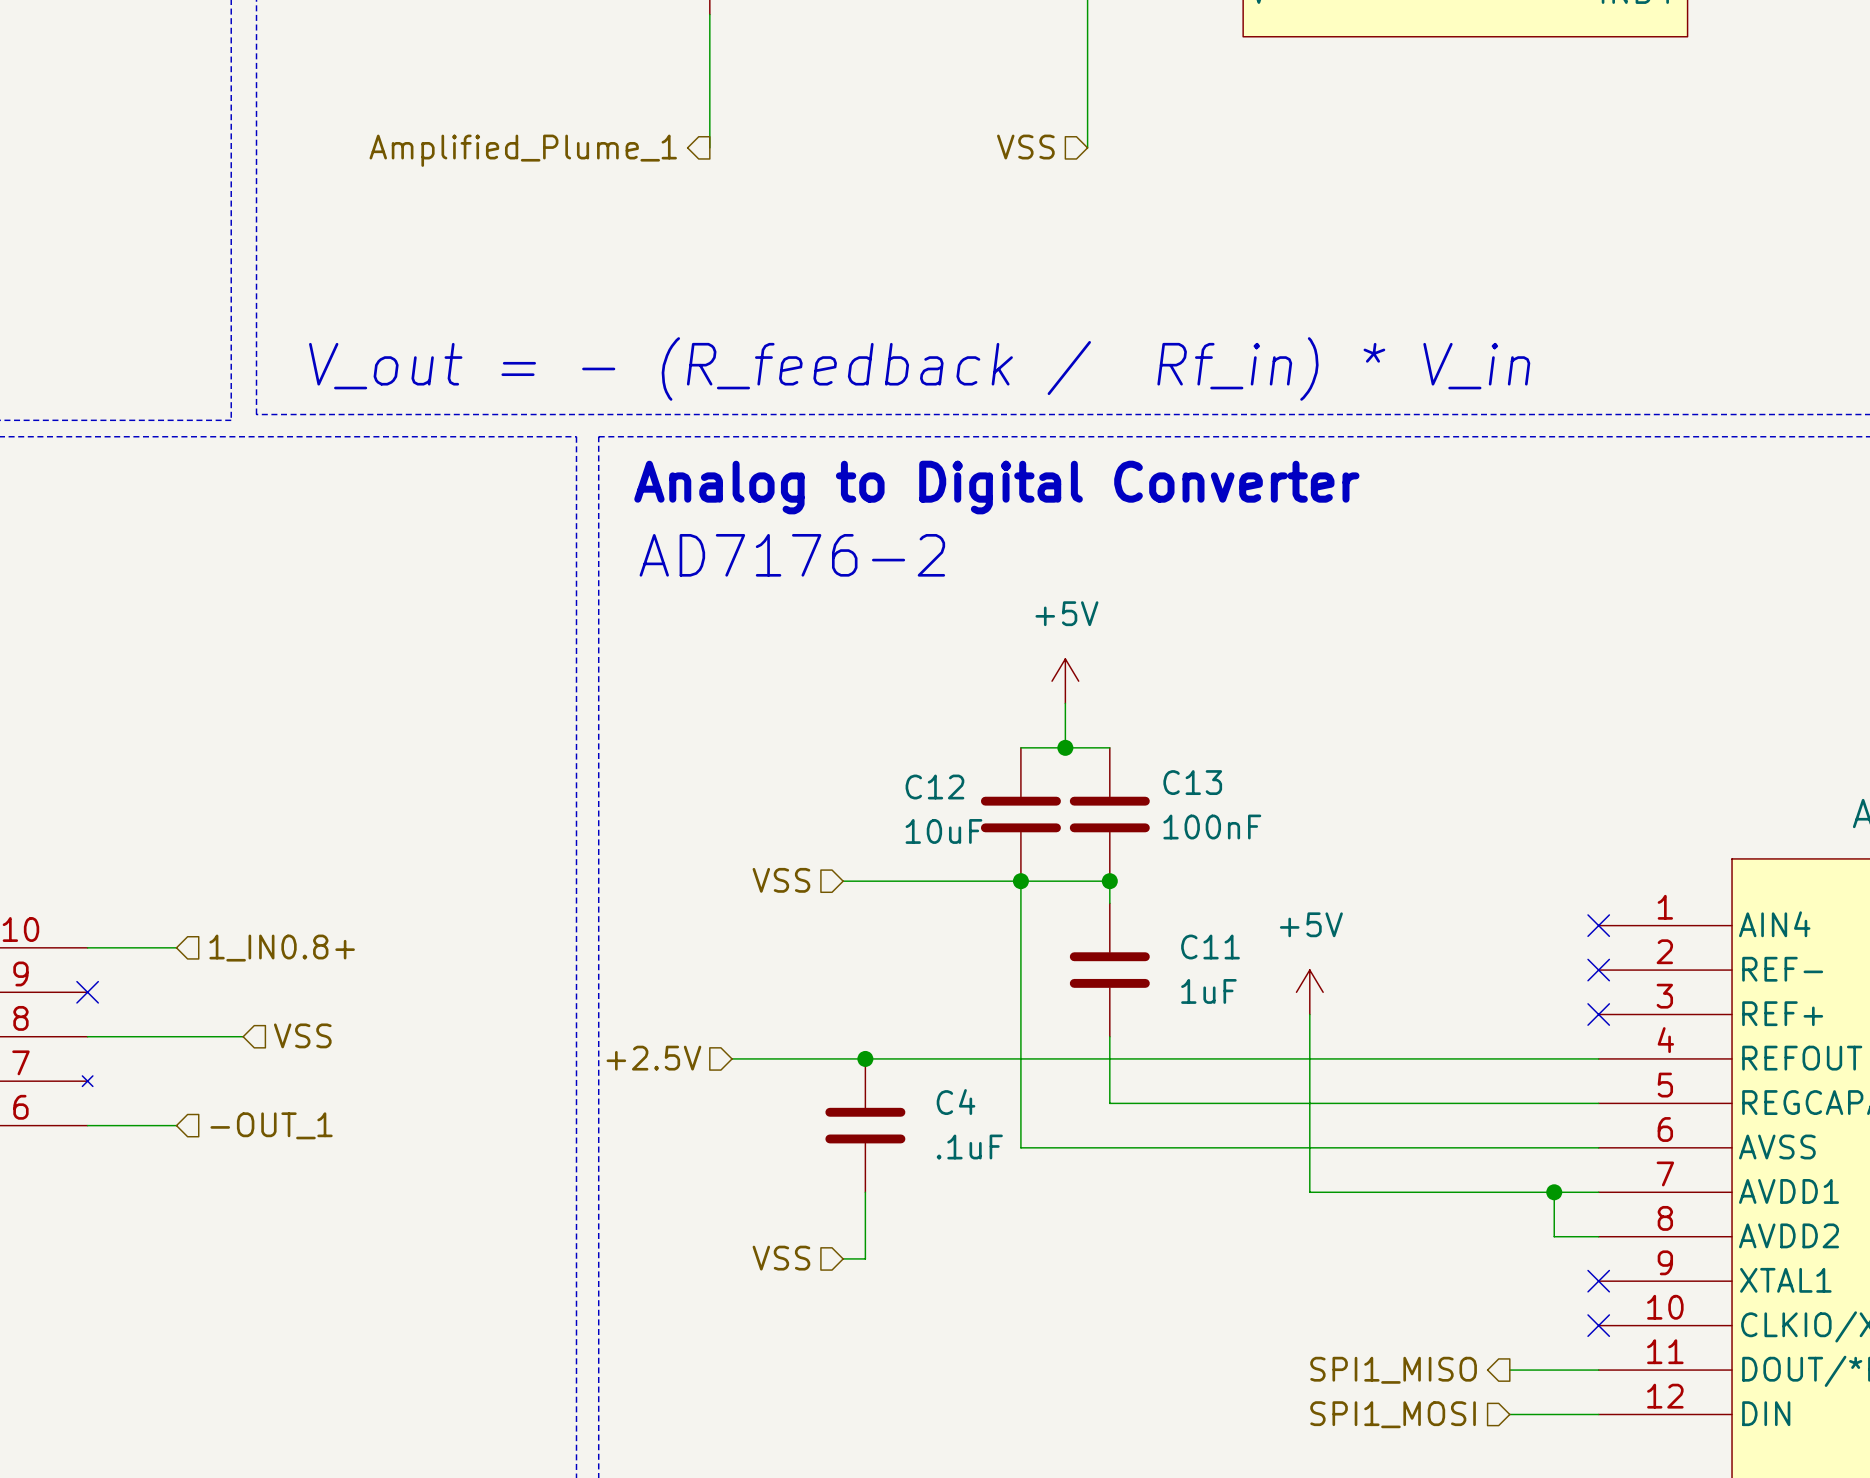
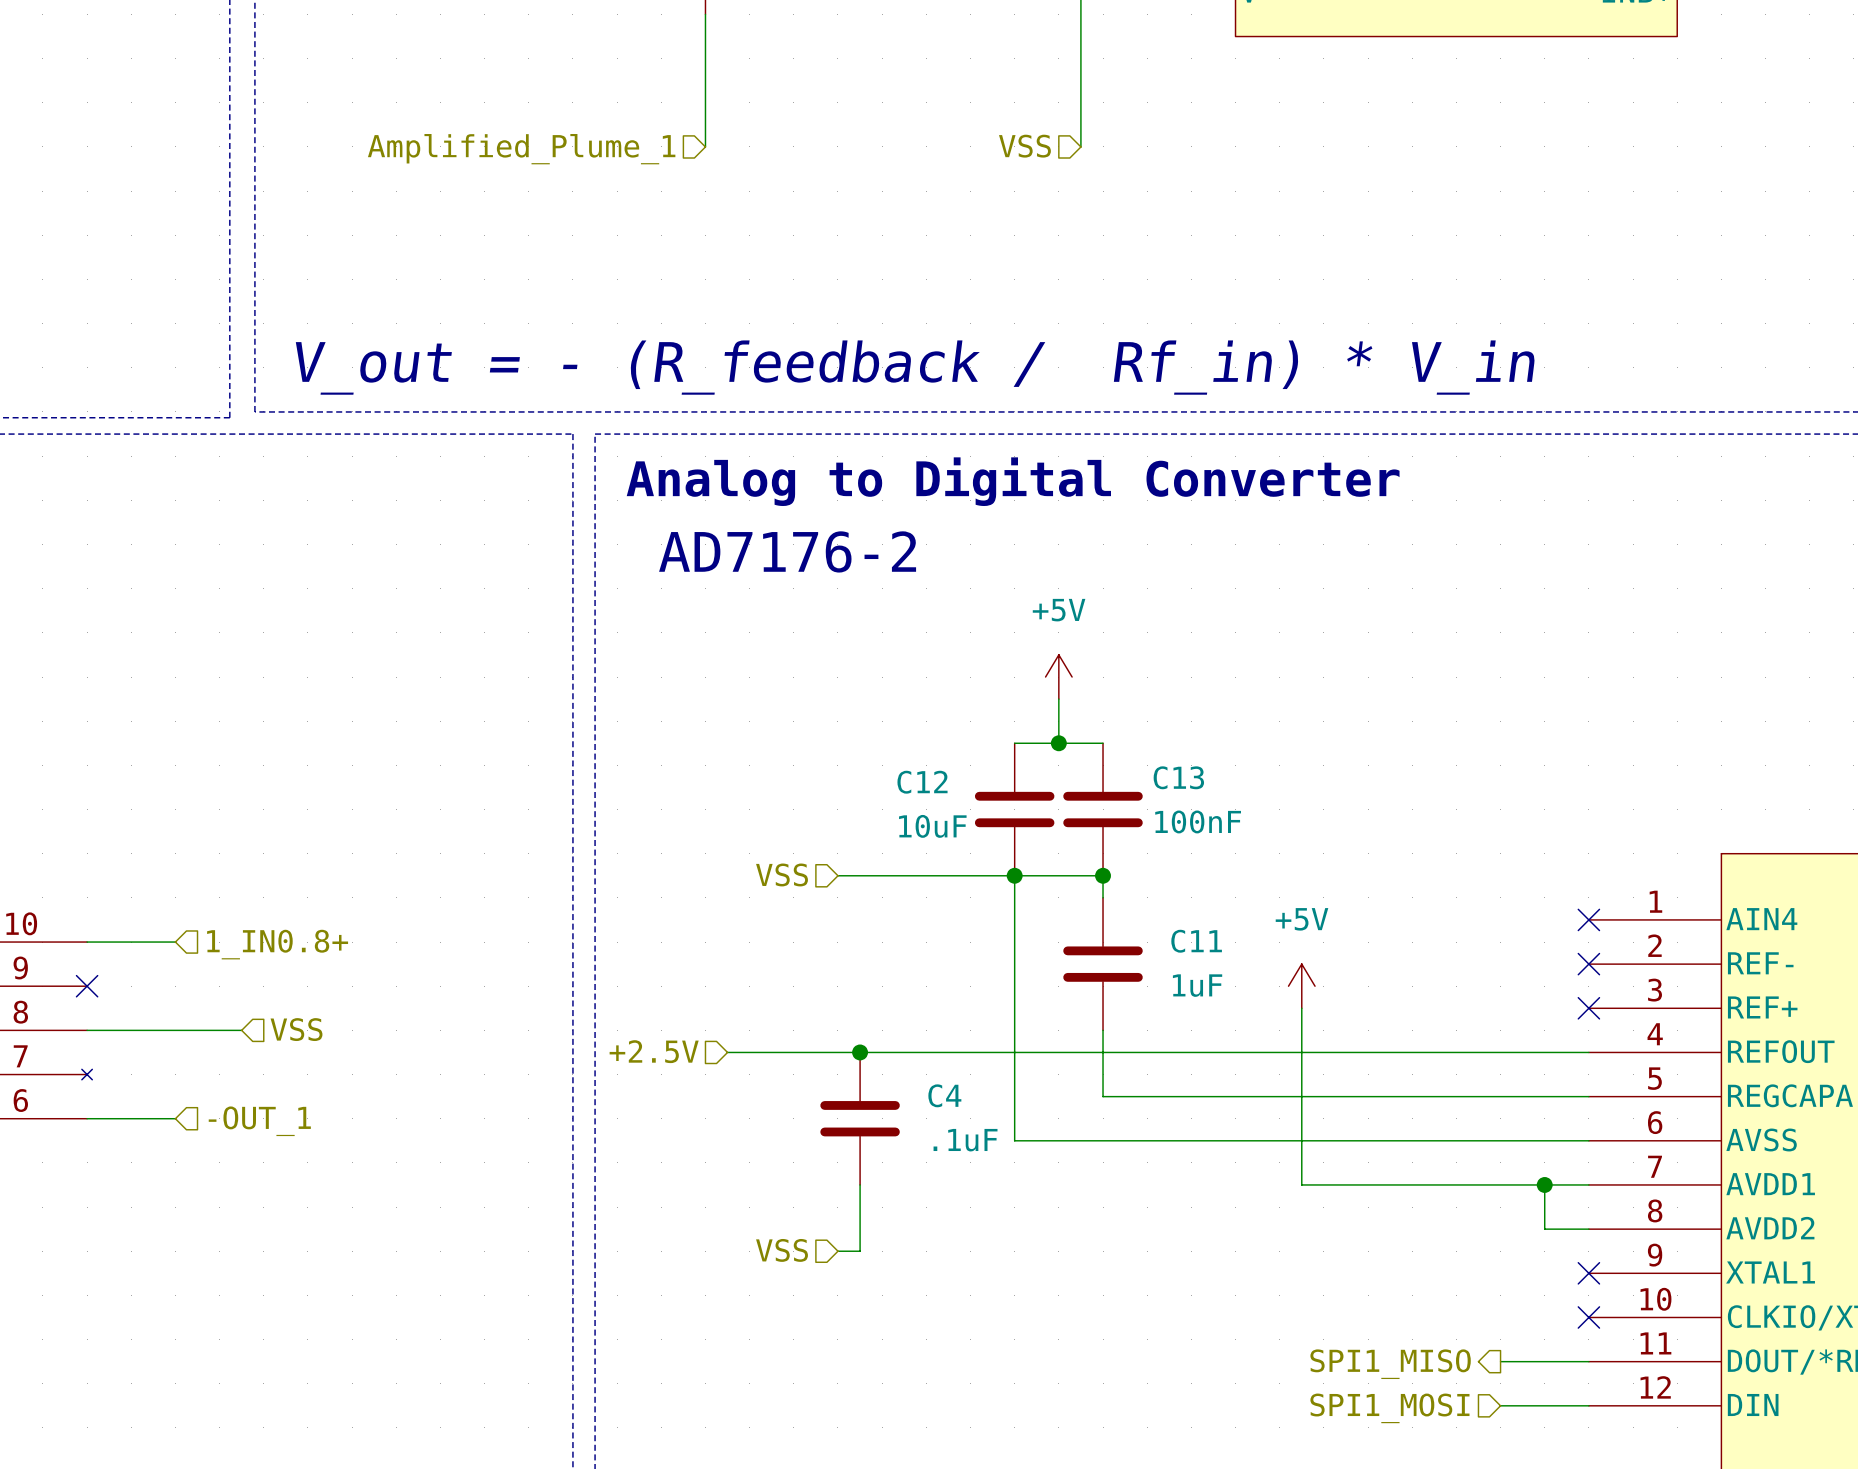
hierarchical label shape: output (523, 150) -> input (521, 149)

